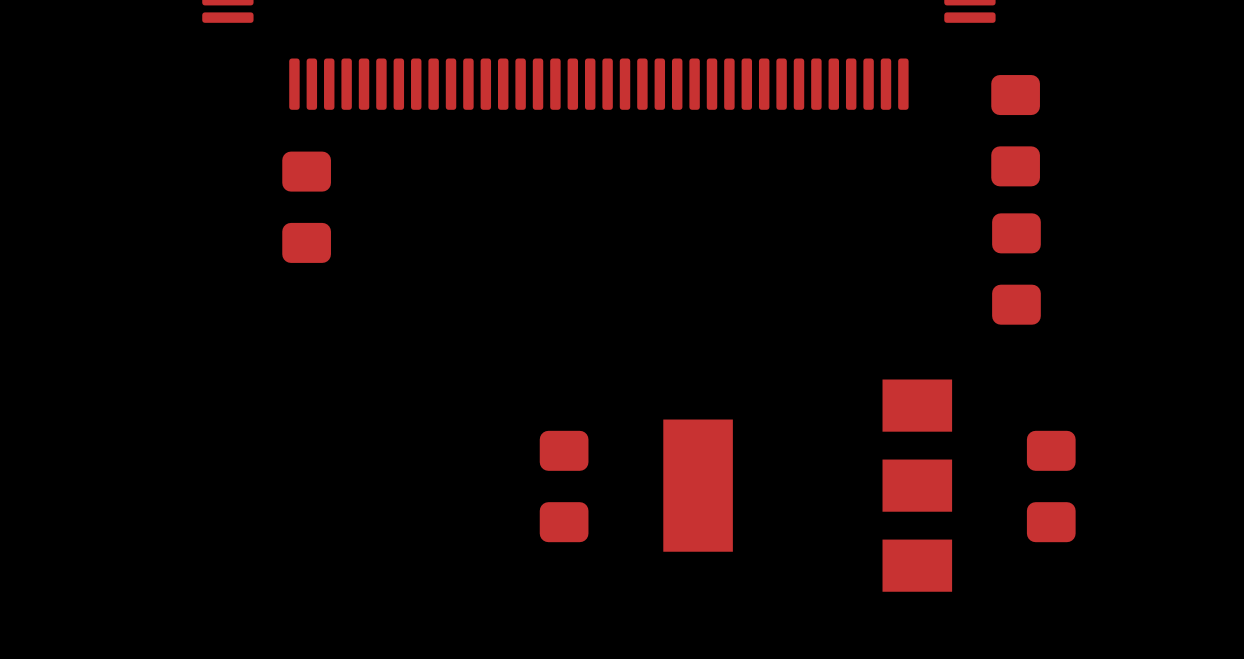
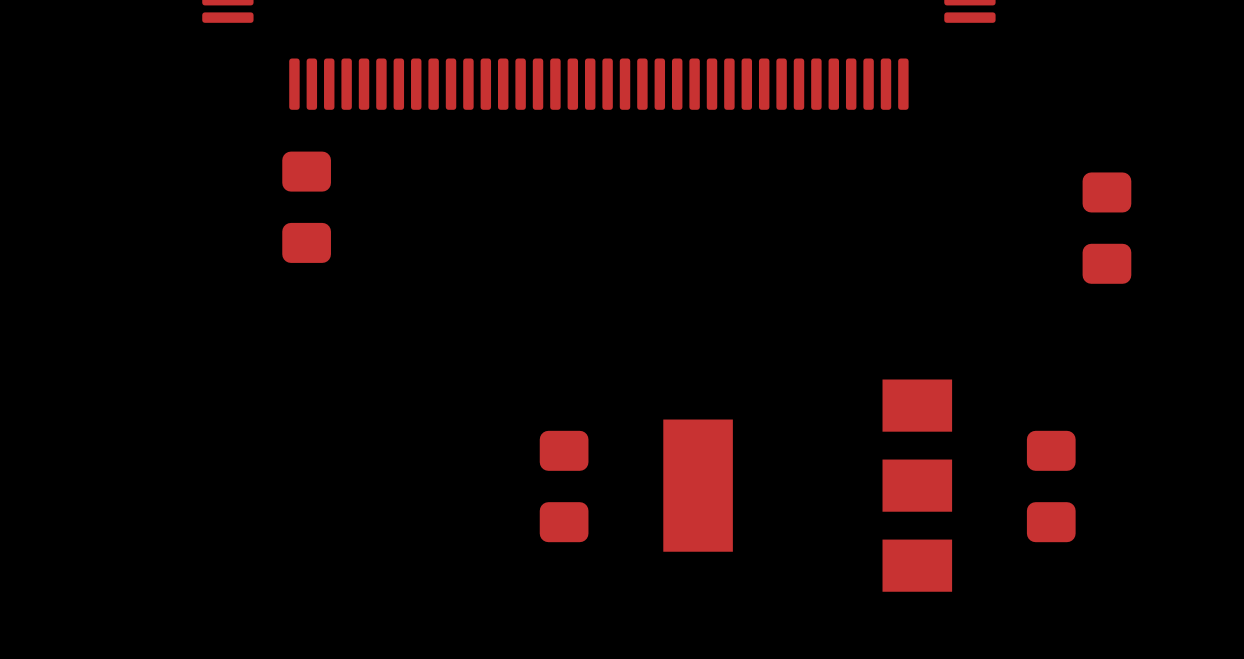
part: (1015, 130) -> none
part: none -> (1106, 228)
part: (1016, 269) -> none

